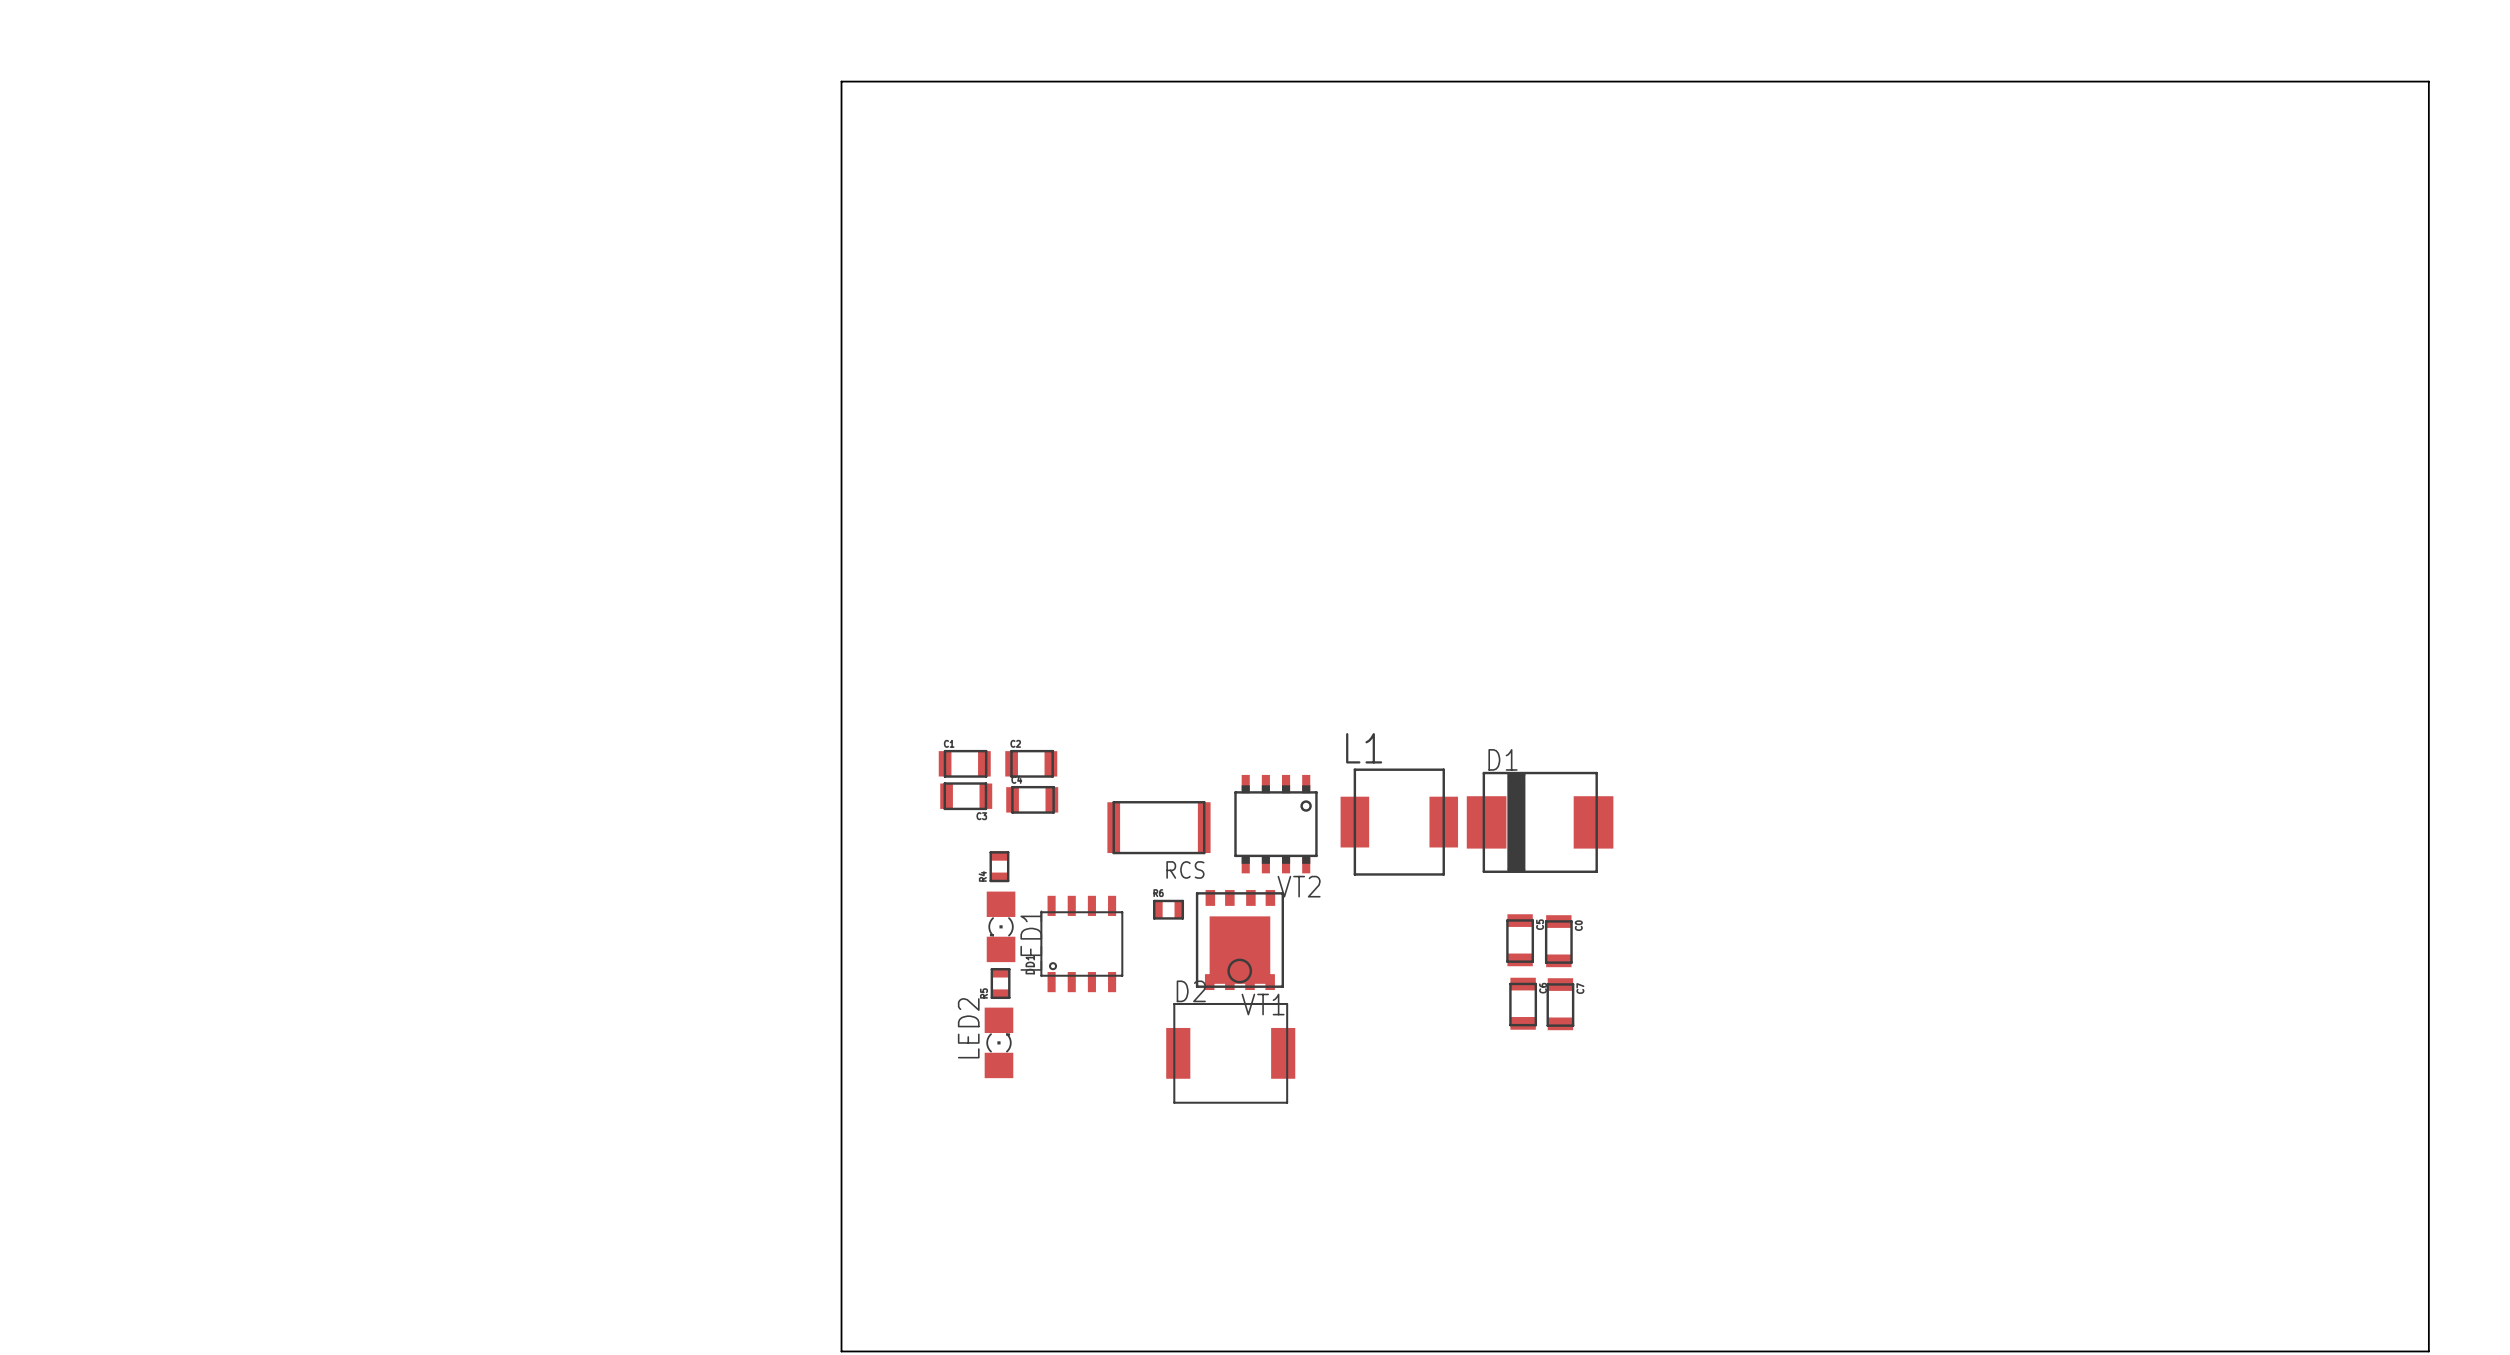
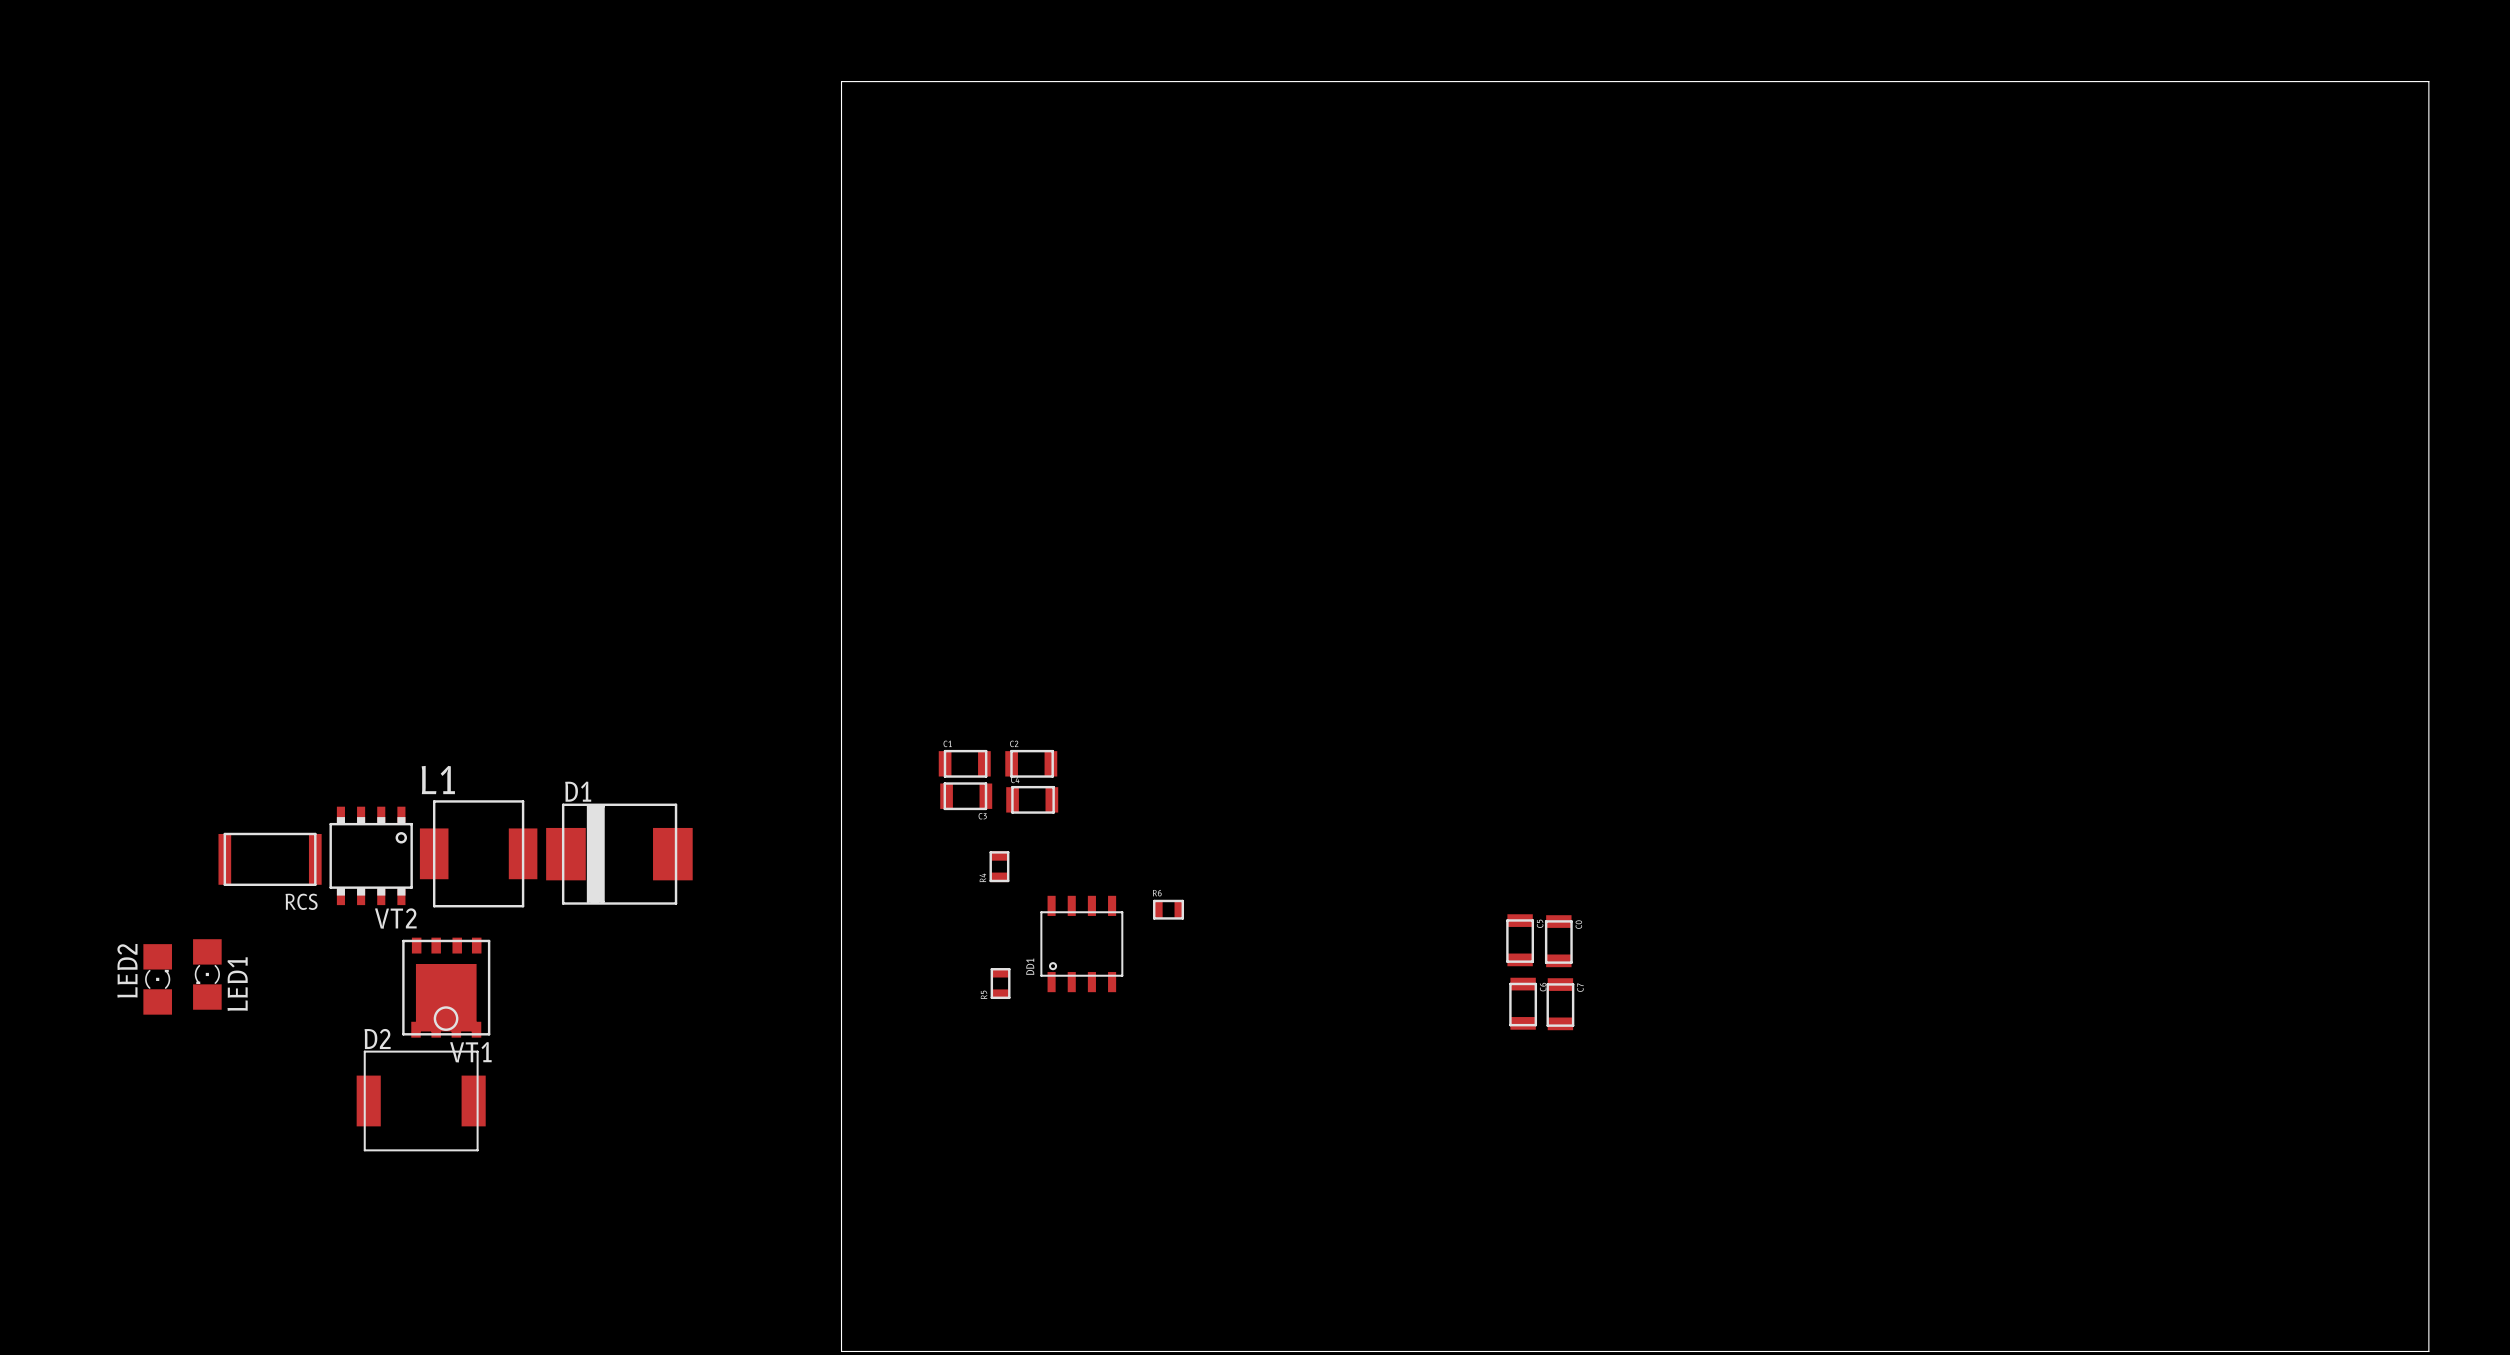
L1 position: (1399, 822) -> (478, 853)
D1 position: (1540, 822) -> (619, 854)
VT2 position: (1275, 824) -> (371, 855)
RCS: (1158, 827) -> none
RCS: none -> (270, 859)
LED1 position: (1001, 926) -> (207, 974)
VT1 position: (1239, 940) -> (446, 987)
LED2 position: (998, 1042) -> (157, 979)
D2 position: (1230, 1053) -> (421, 1100)

